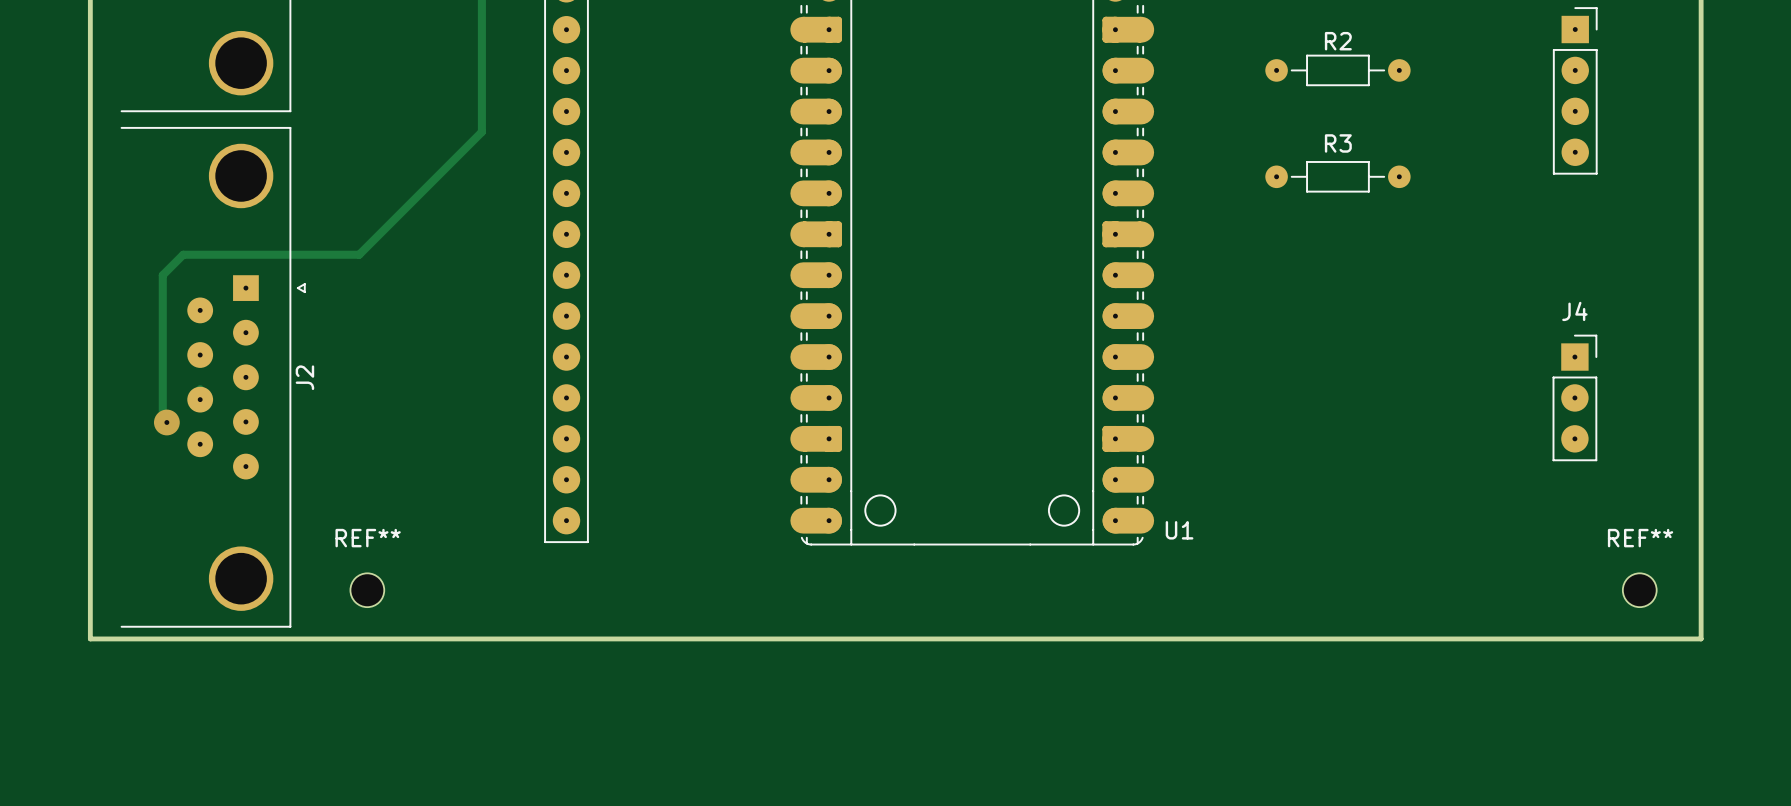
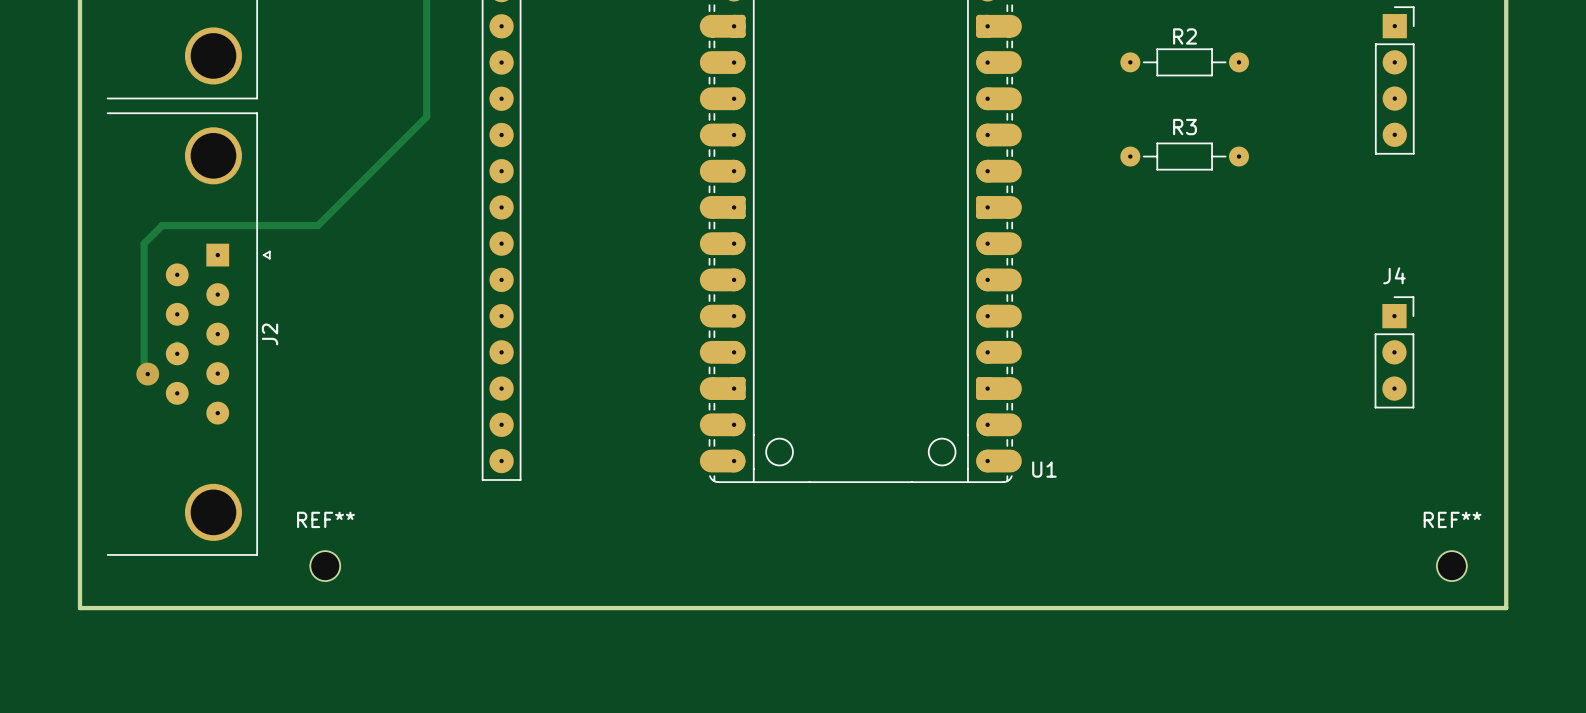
REF** position: (367, 590) -> (325, 566)
REF** position: (1639, 590) -> (1451, 566)
board edge: (90, 638) (1701, 638) -> (80, 565) (80, 608) (1506, 608) (1506, 565)

